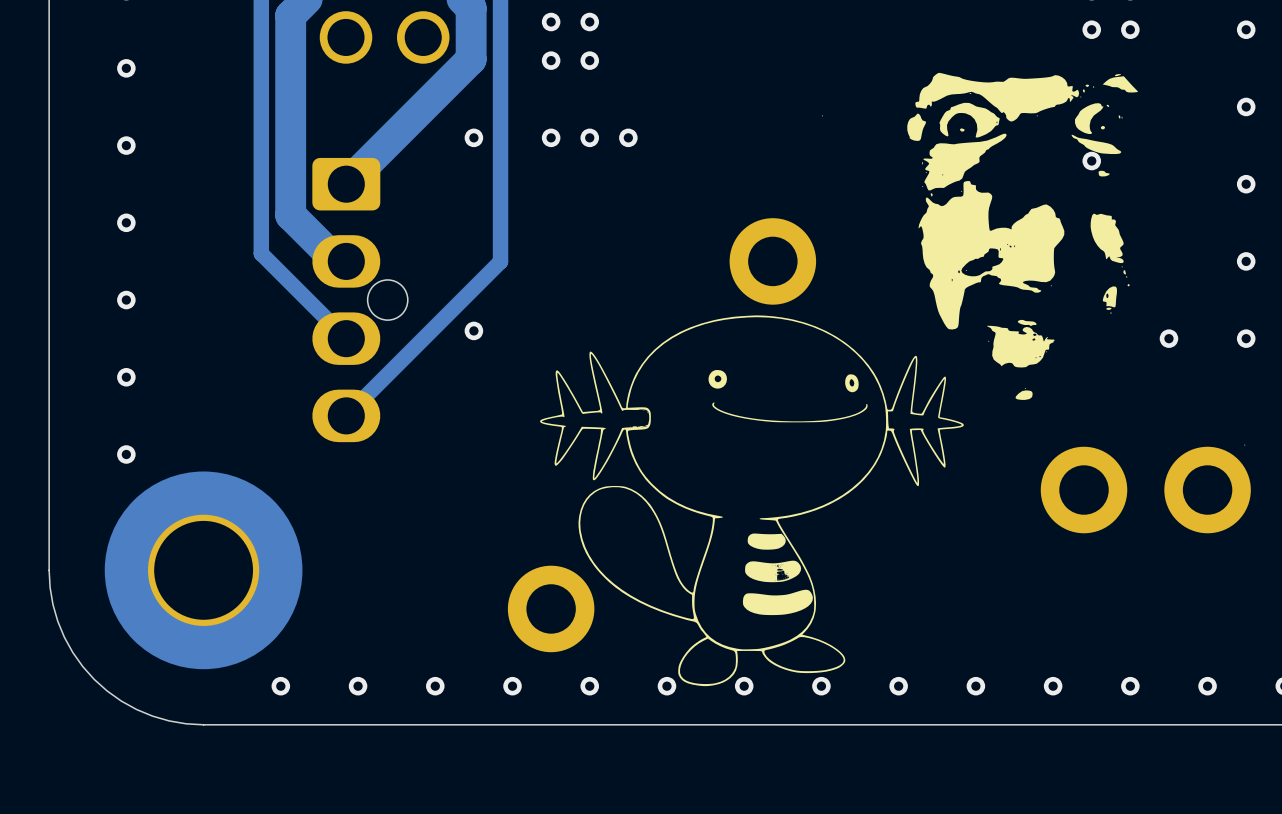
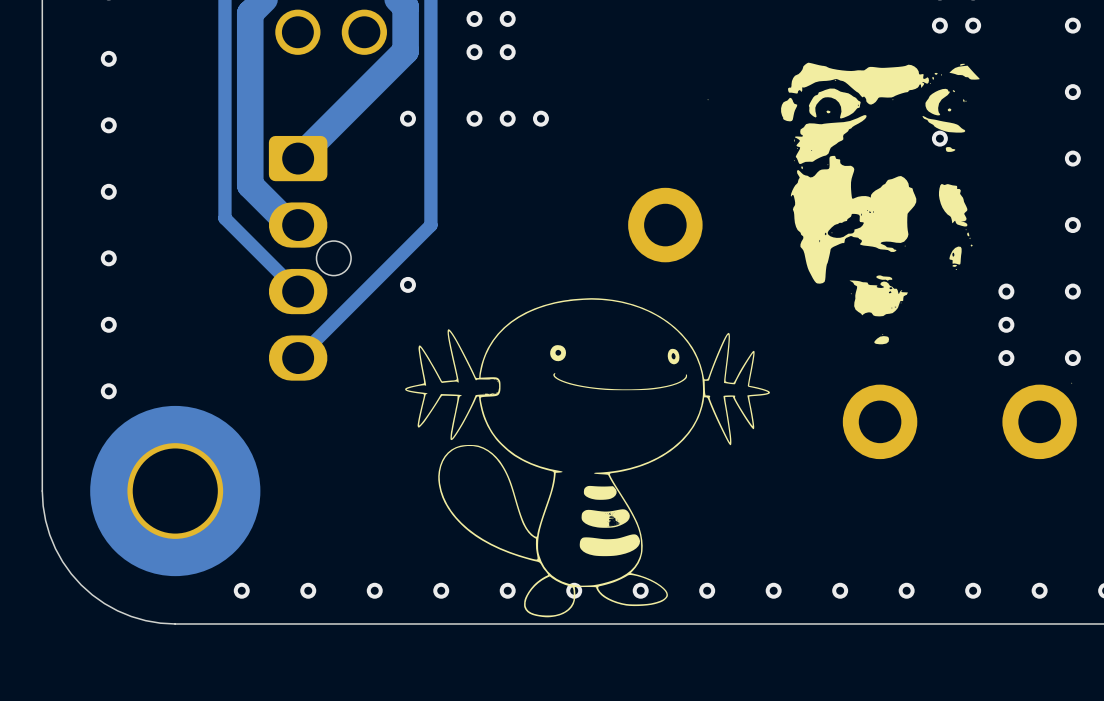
via: none -> (1006, 324)
via: none -> (1006, 358)
via: none -> (1072, 358)
part position: (1084, 490) -> (880, 421)
drawing position: (751, 500) -> (587, 457)
part: (551, 608) -> none

